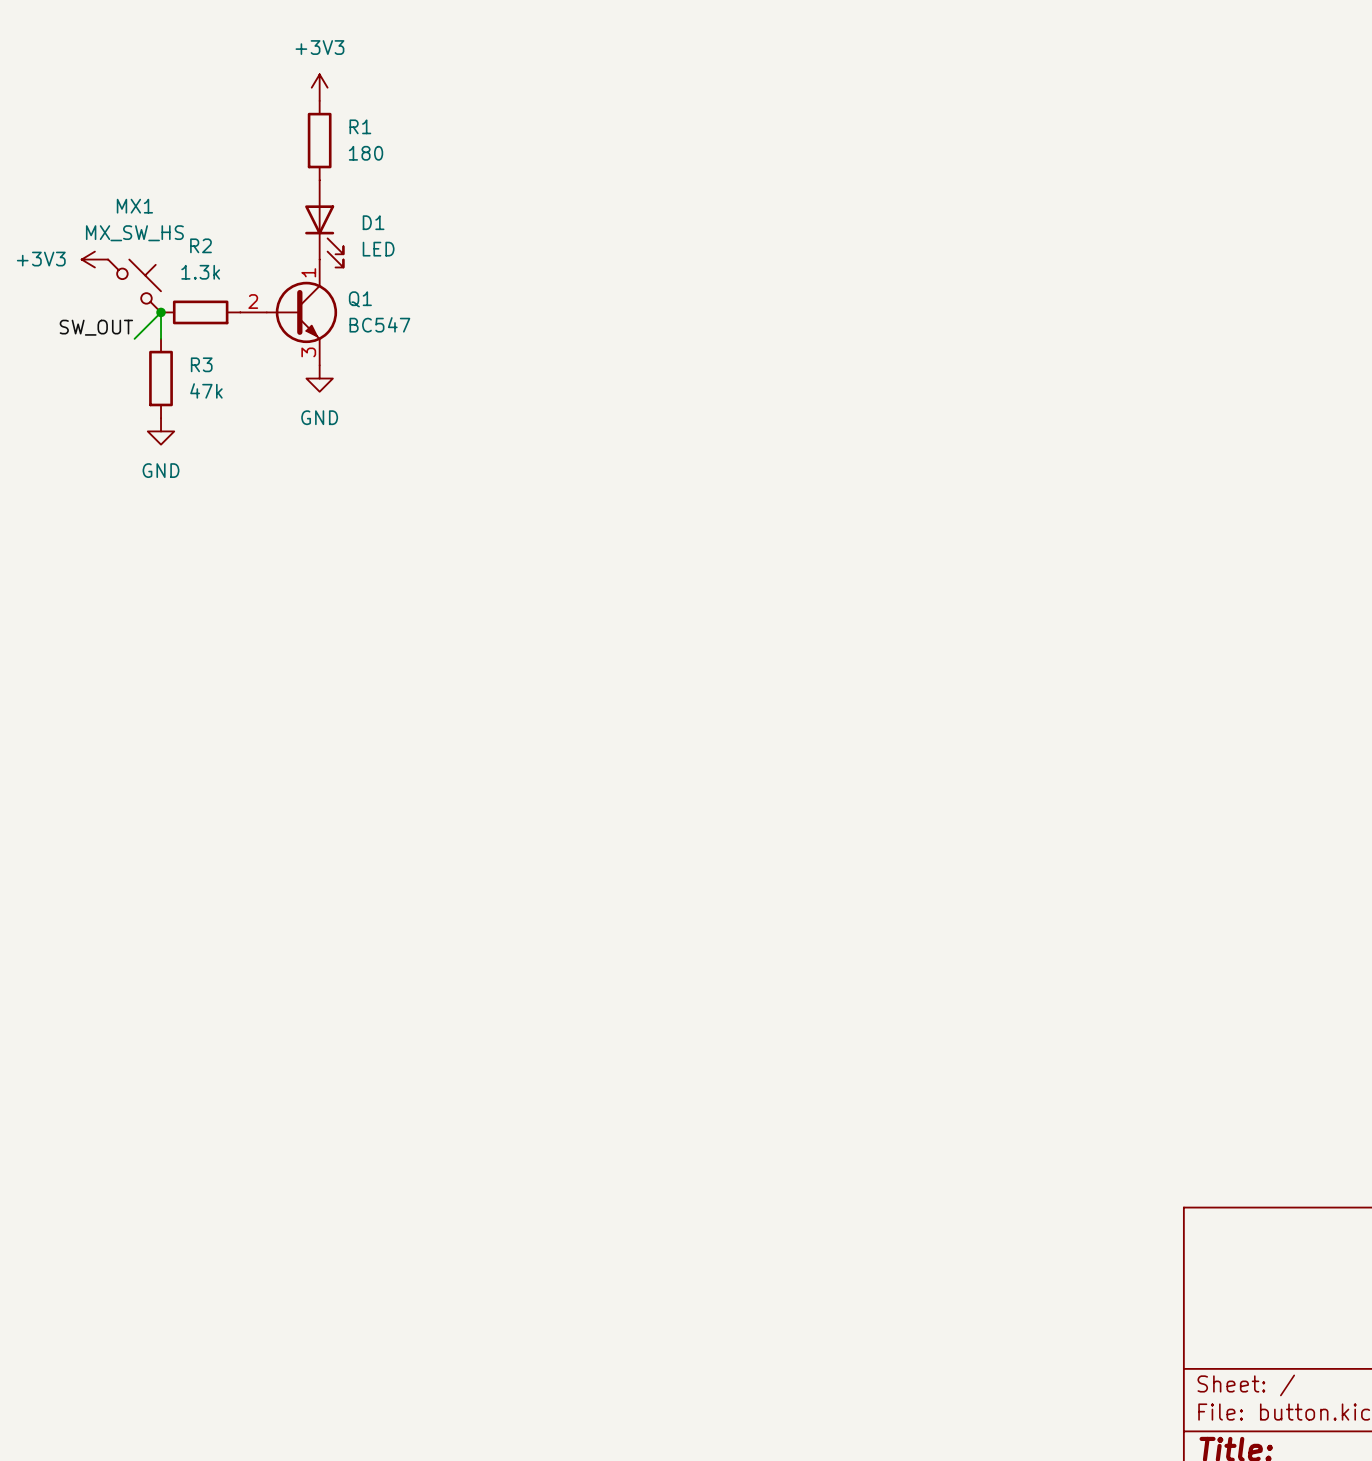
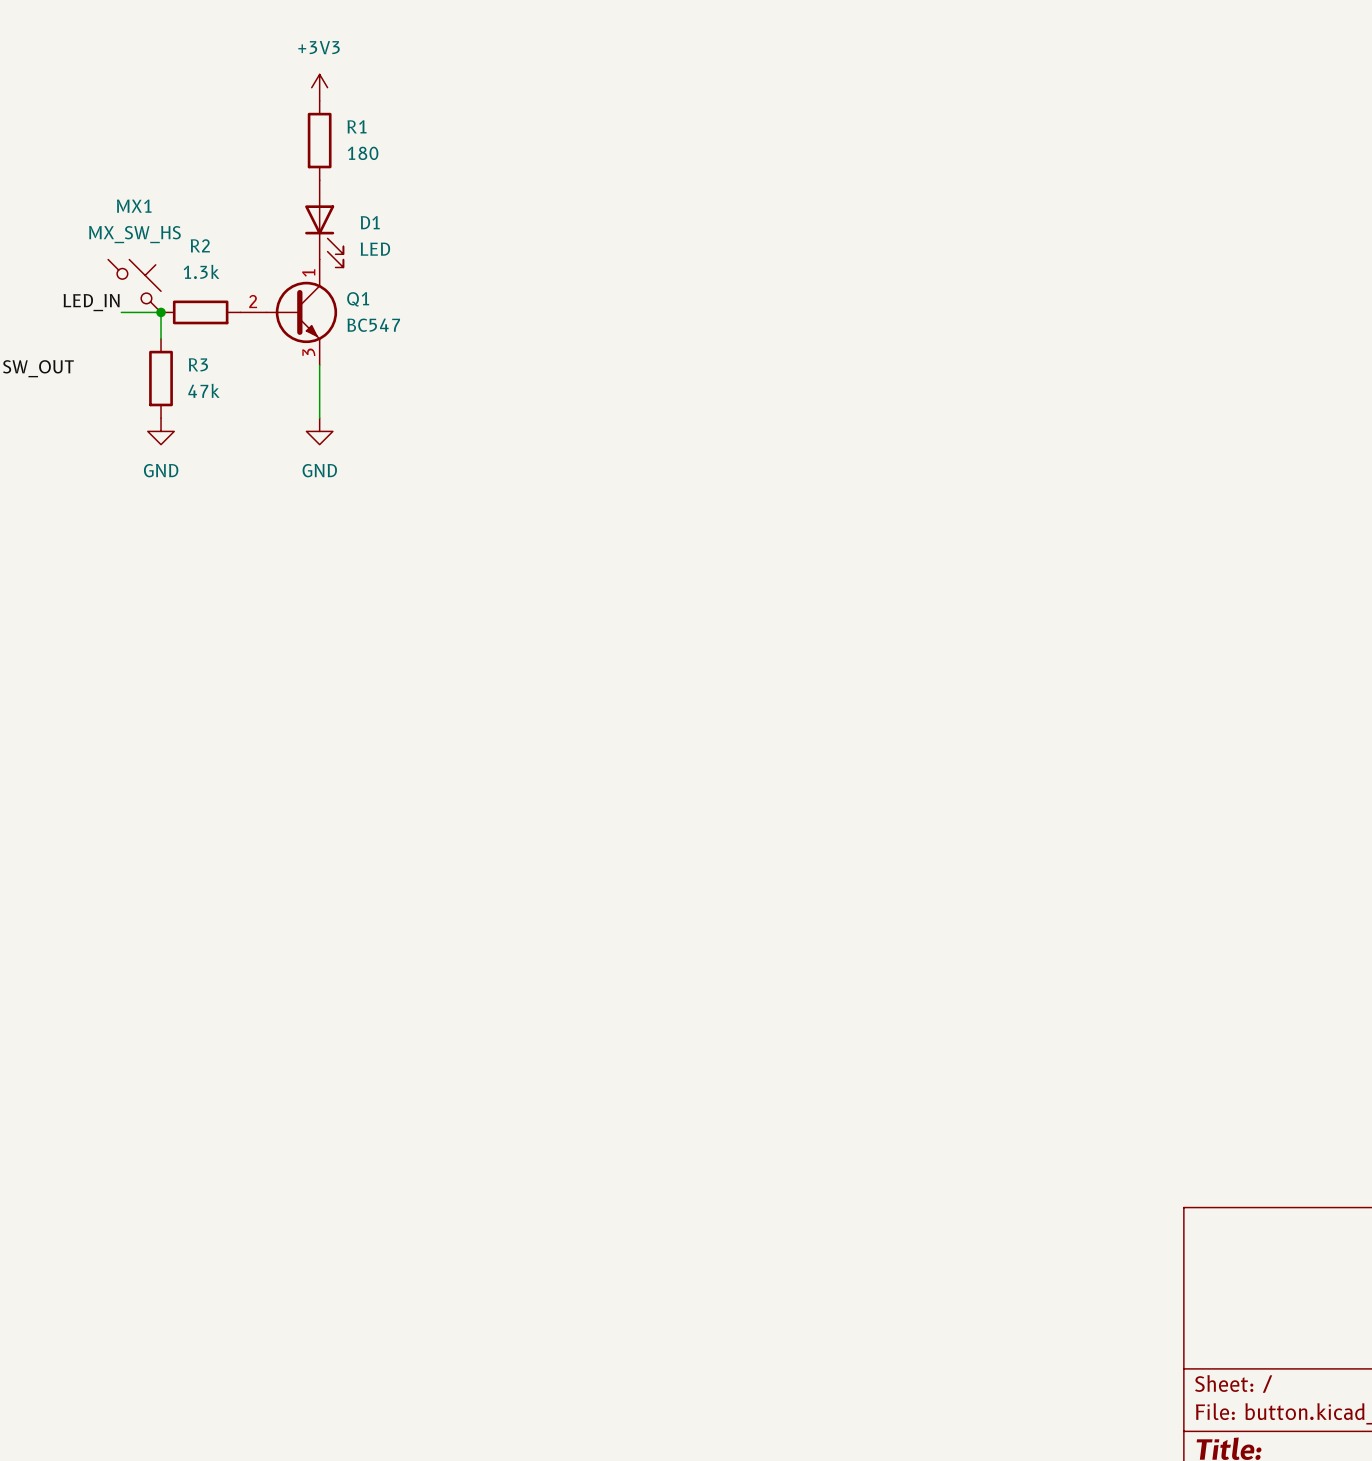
power symbol: +3V3 (94, 259) -> none
label: none -> LED_IN (91, 302)
wire: (161, 312) (134, 338) -> (161, 312) (121, 312)
label position: SW_OUT (96, 327) -> SW_OUT (38, 368)
wire: none -> (319, 365) (319, 418)
power symbol position: GND (319, 378) -> GND (319, 431)

